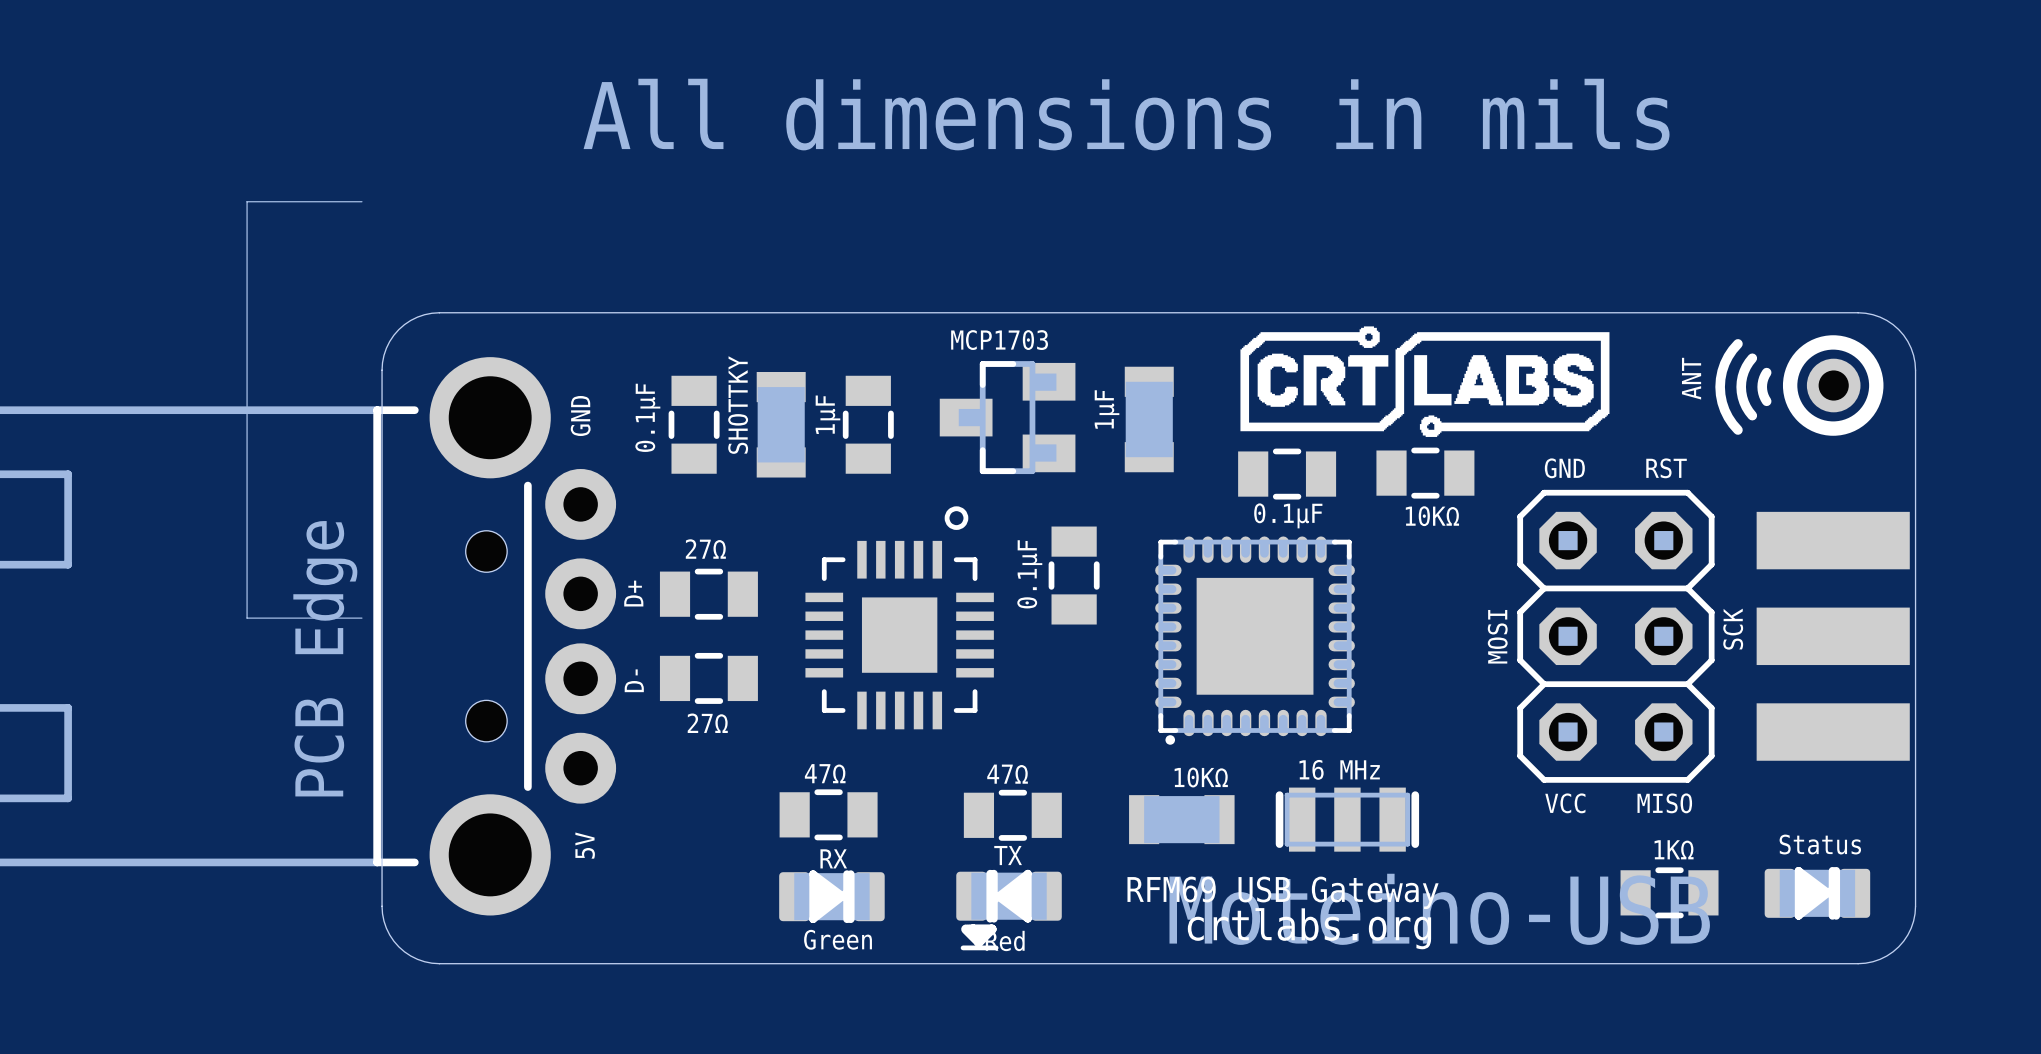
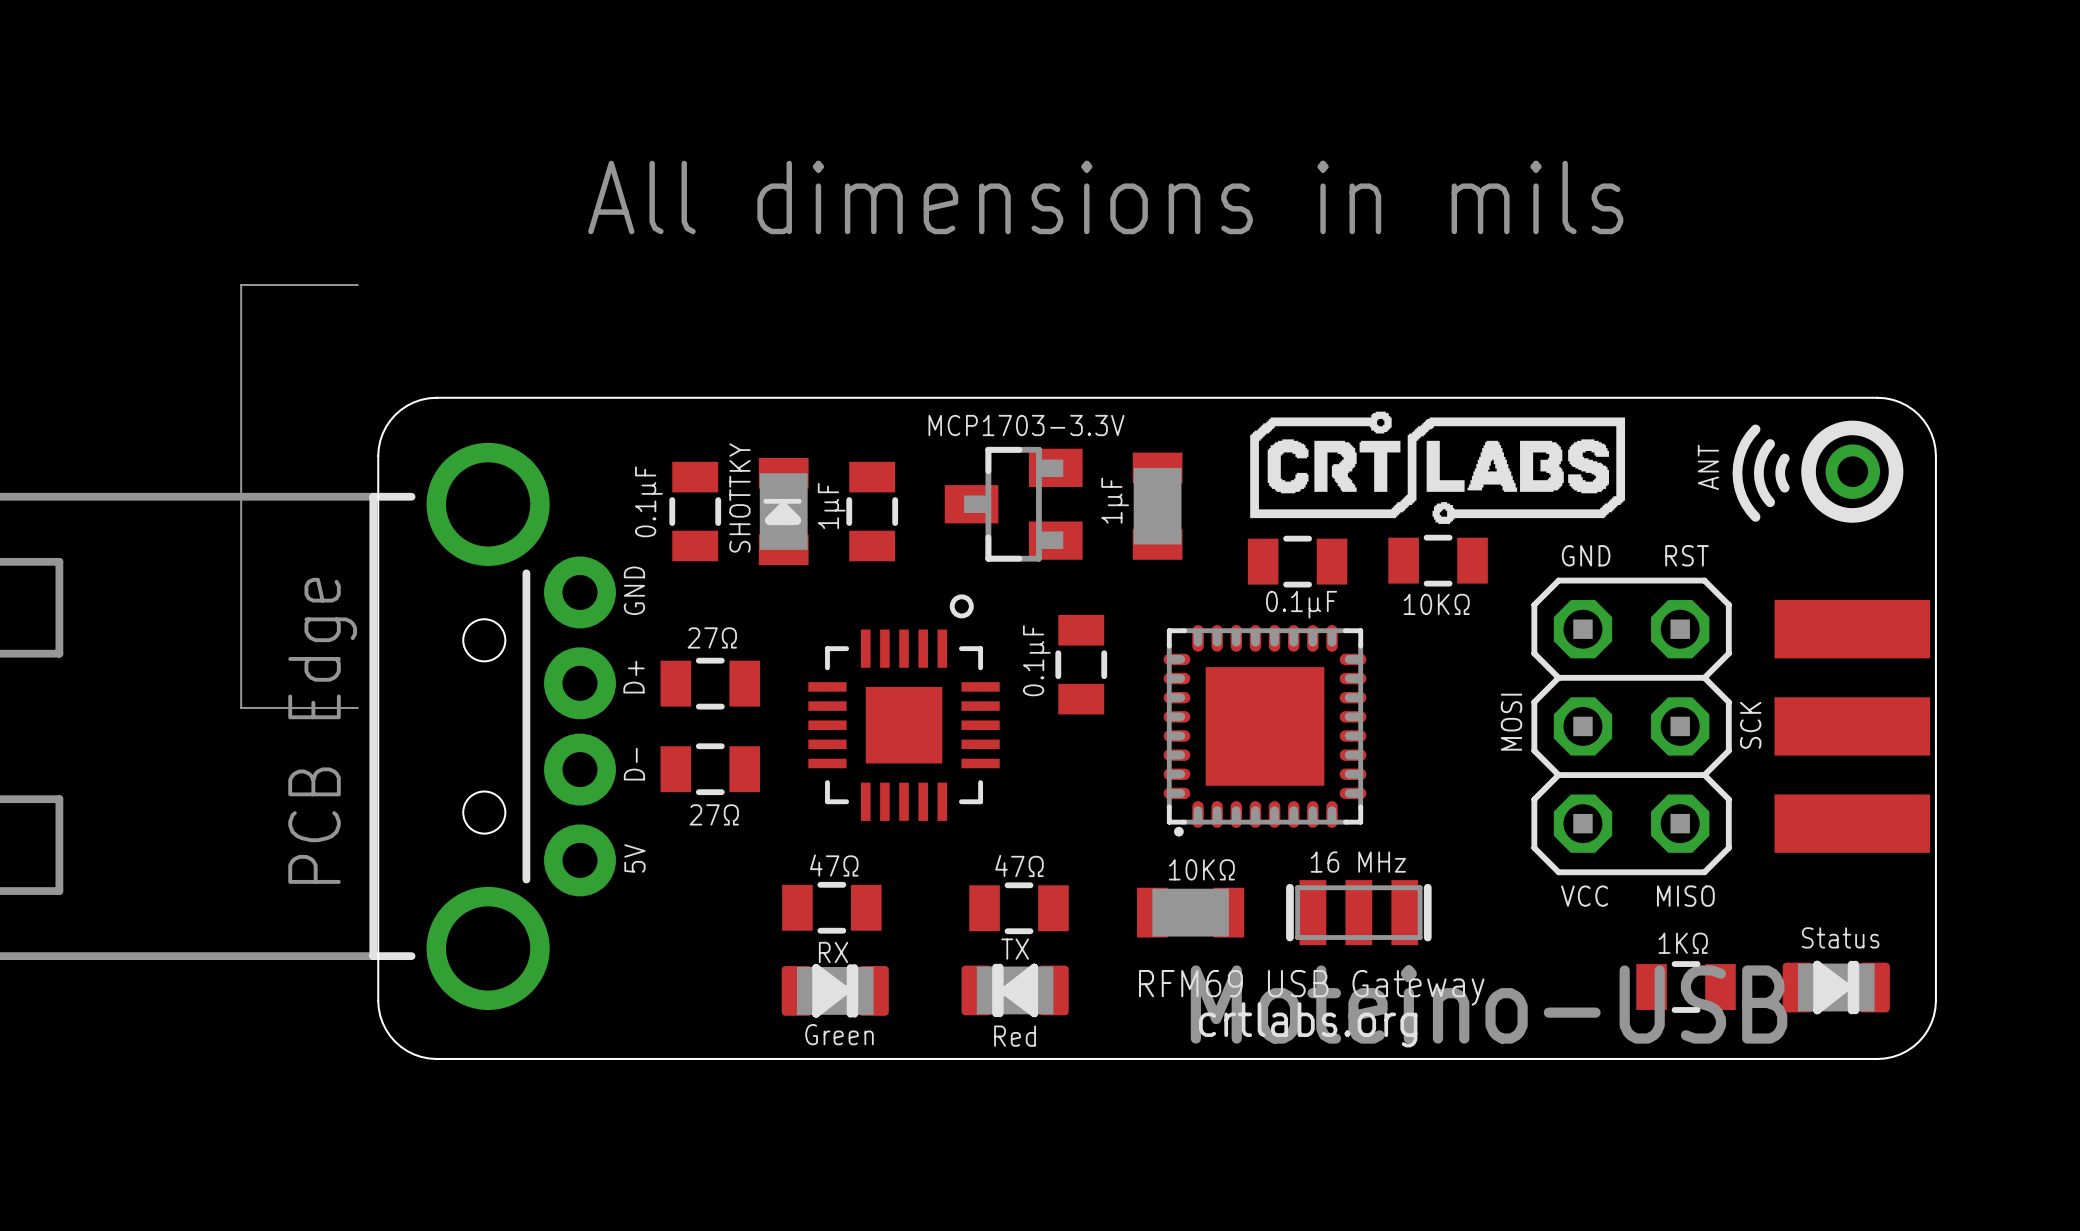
part value: MCP1703 (999, 340) -> MCP1703-3.3V (1026, 425)
text position: GND (580, 416) -> GND (634, 590)
line: none -> (793, 520) (770, 520) (783, 507) (796, 520)
text position: 5V (585, 845) -> 5V (634, 858)
line: (965, 929) (978, 942) (991, 929) (968, 929) -> none
line: (963, 947) (996, 947) -> (765, 501) (799, 501)

